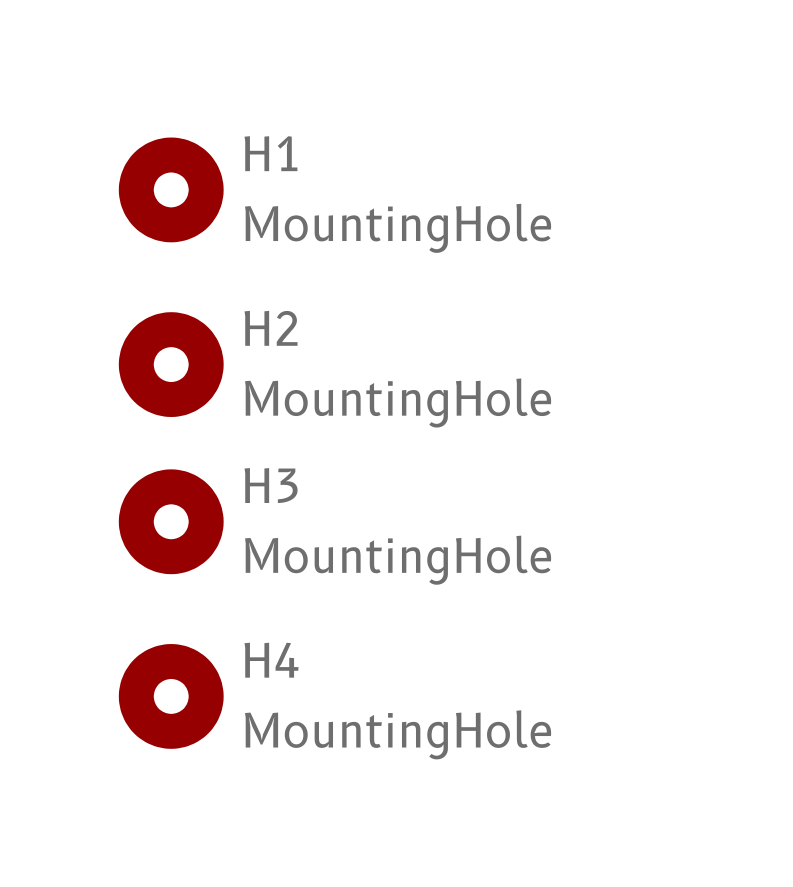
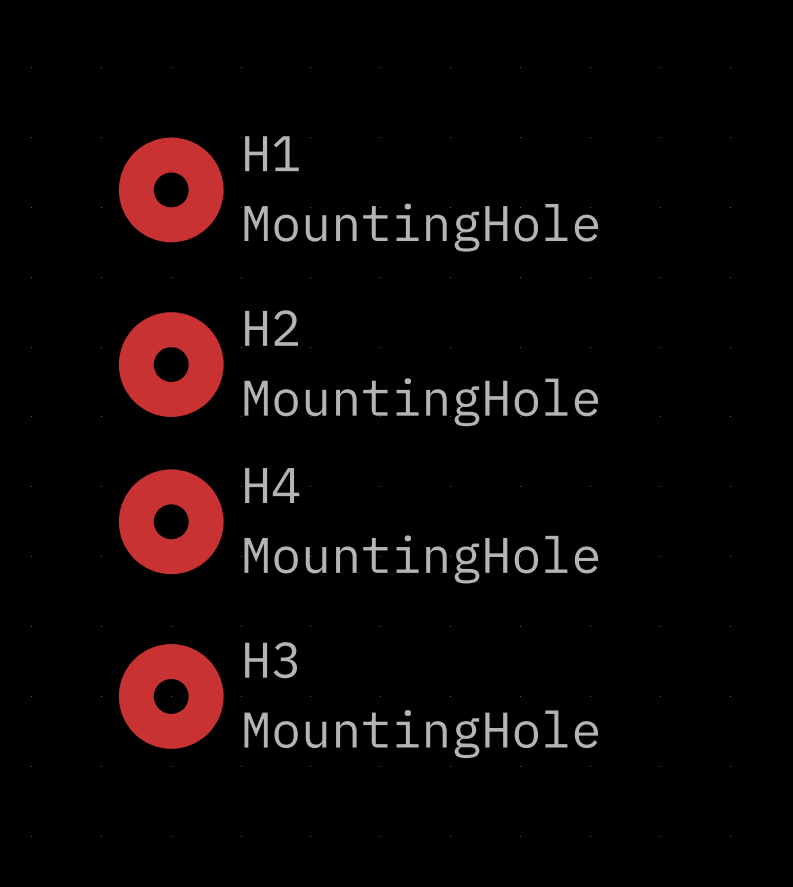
H3 name: H3 (271, 485) -> H4 (272, 485)
H4 name: H4 (271, 660) -> H3 (271, 660)

